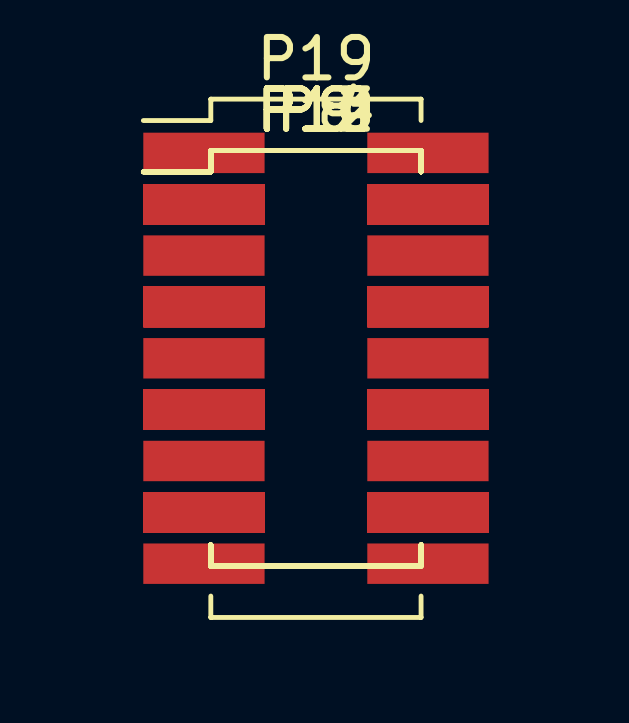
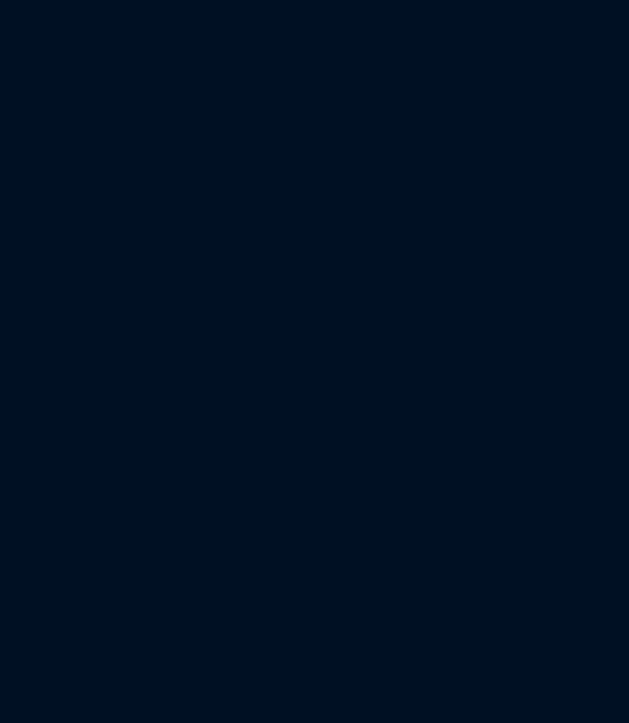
part: (314, 358) -> none
part: (314, 358) -> none
part: (314, 358) -> none
part: (314, 358) -> none
part: (314, 358) -> none
part: (314, 358) -> none
P19: (314, 358) -> none

